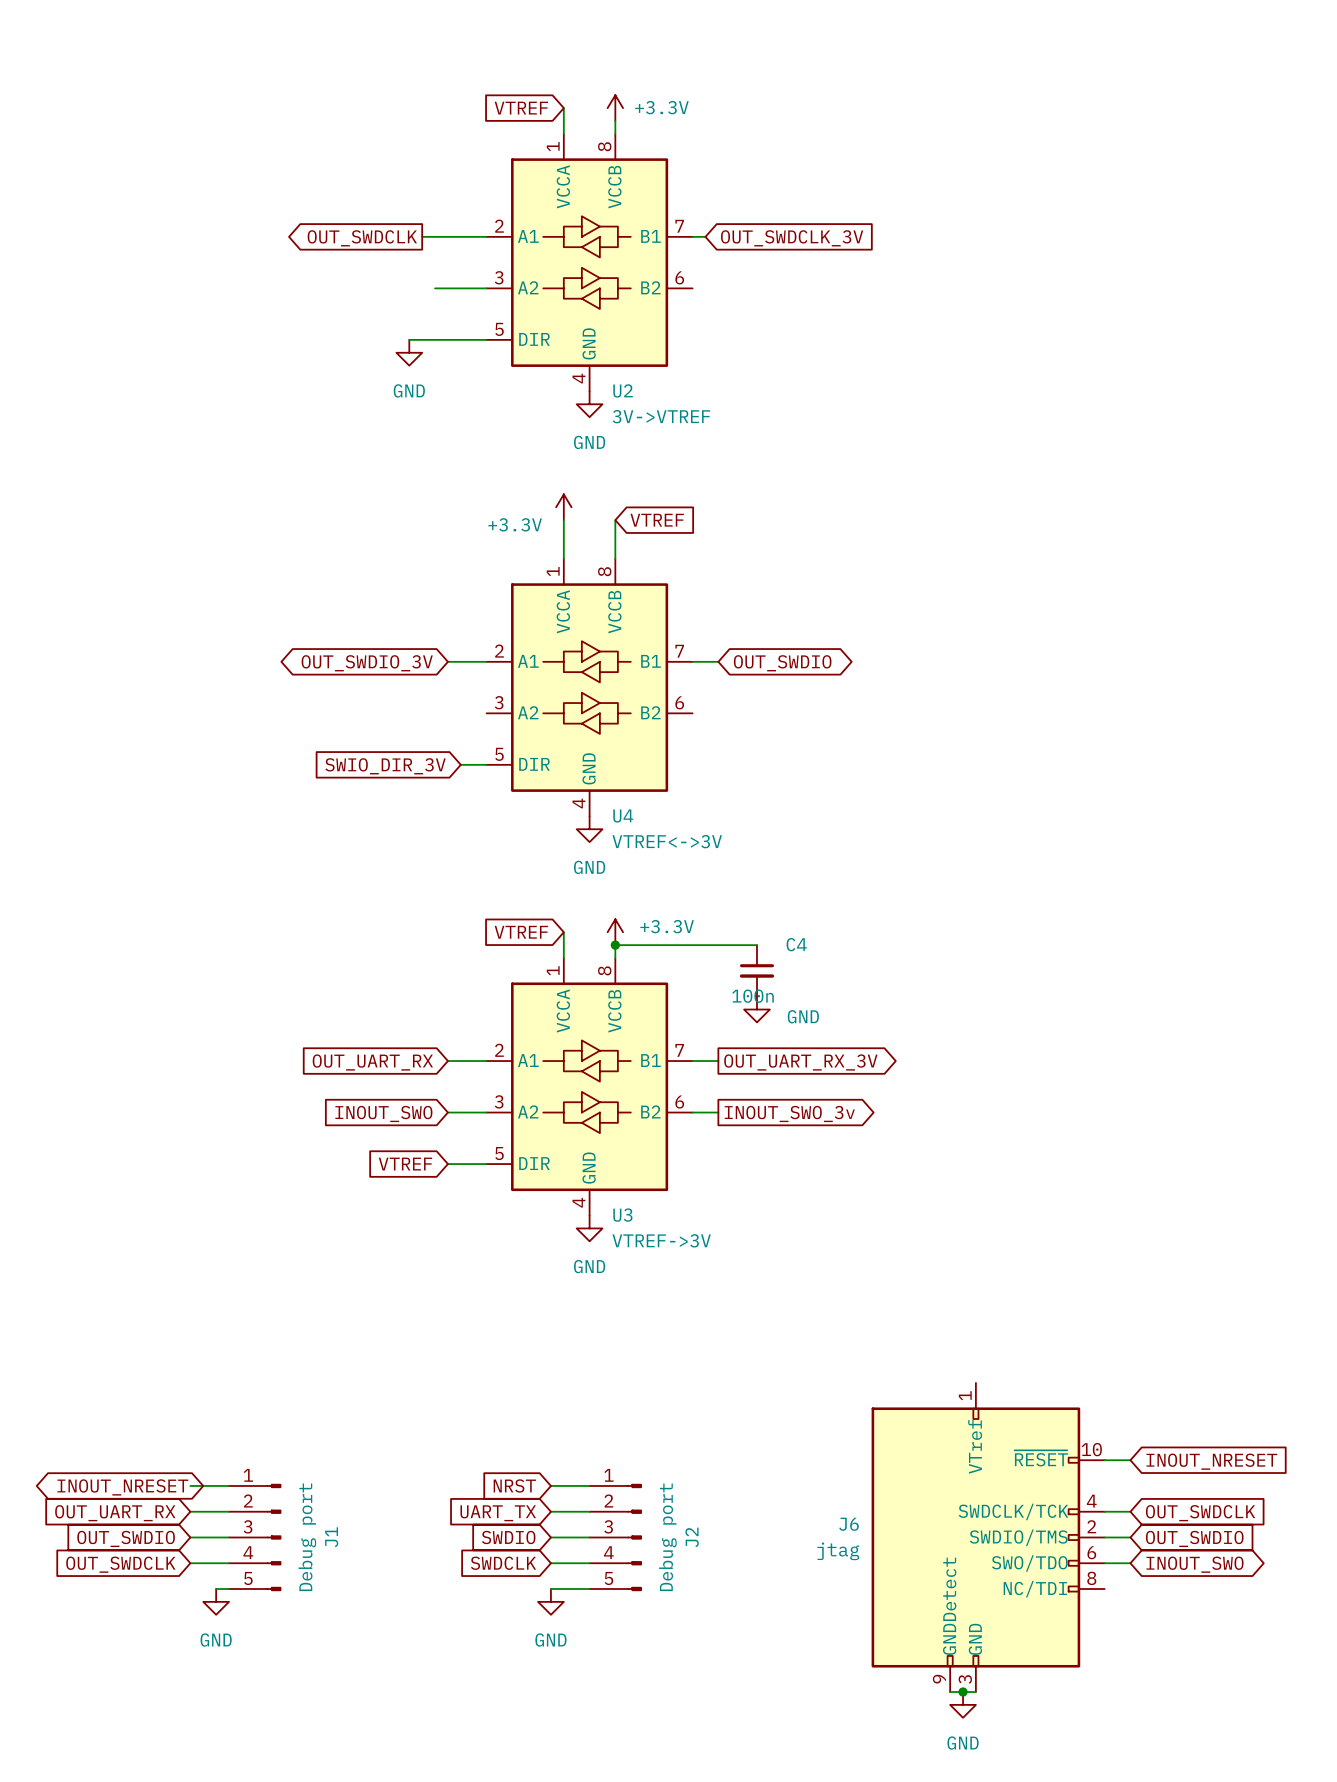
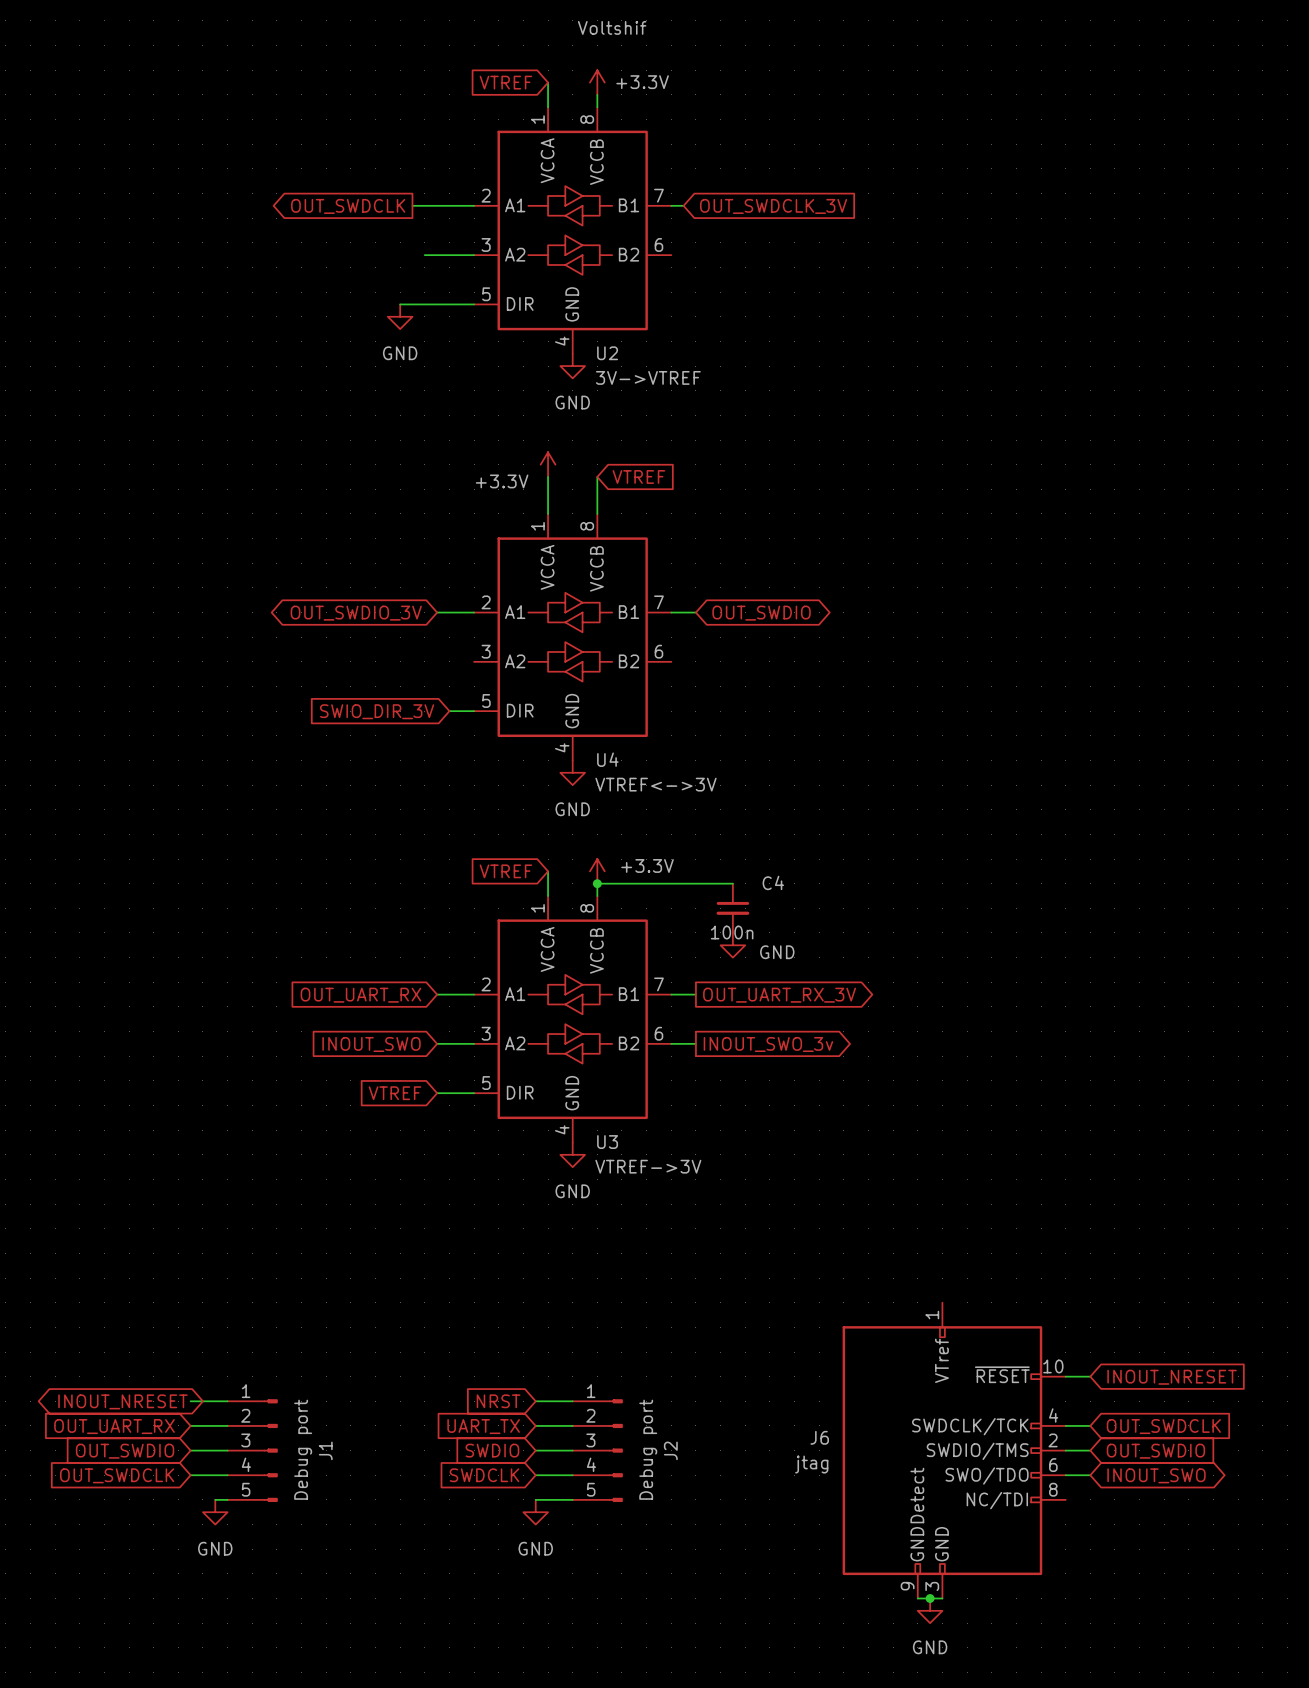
U2 text: none -> Voltshif (612, 27)

